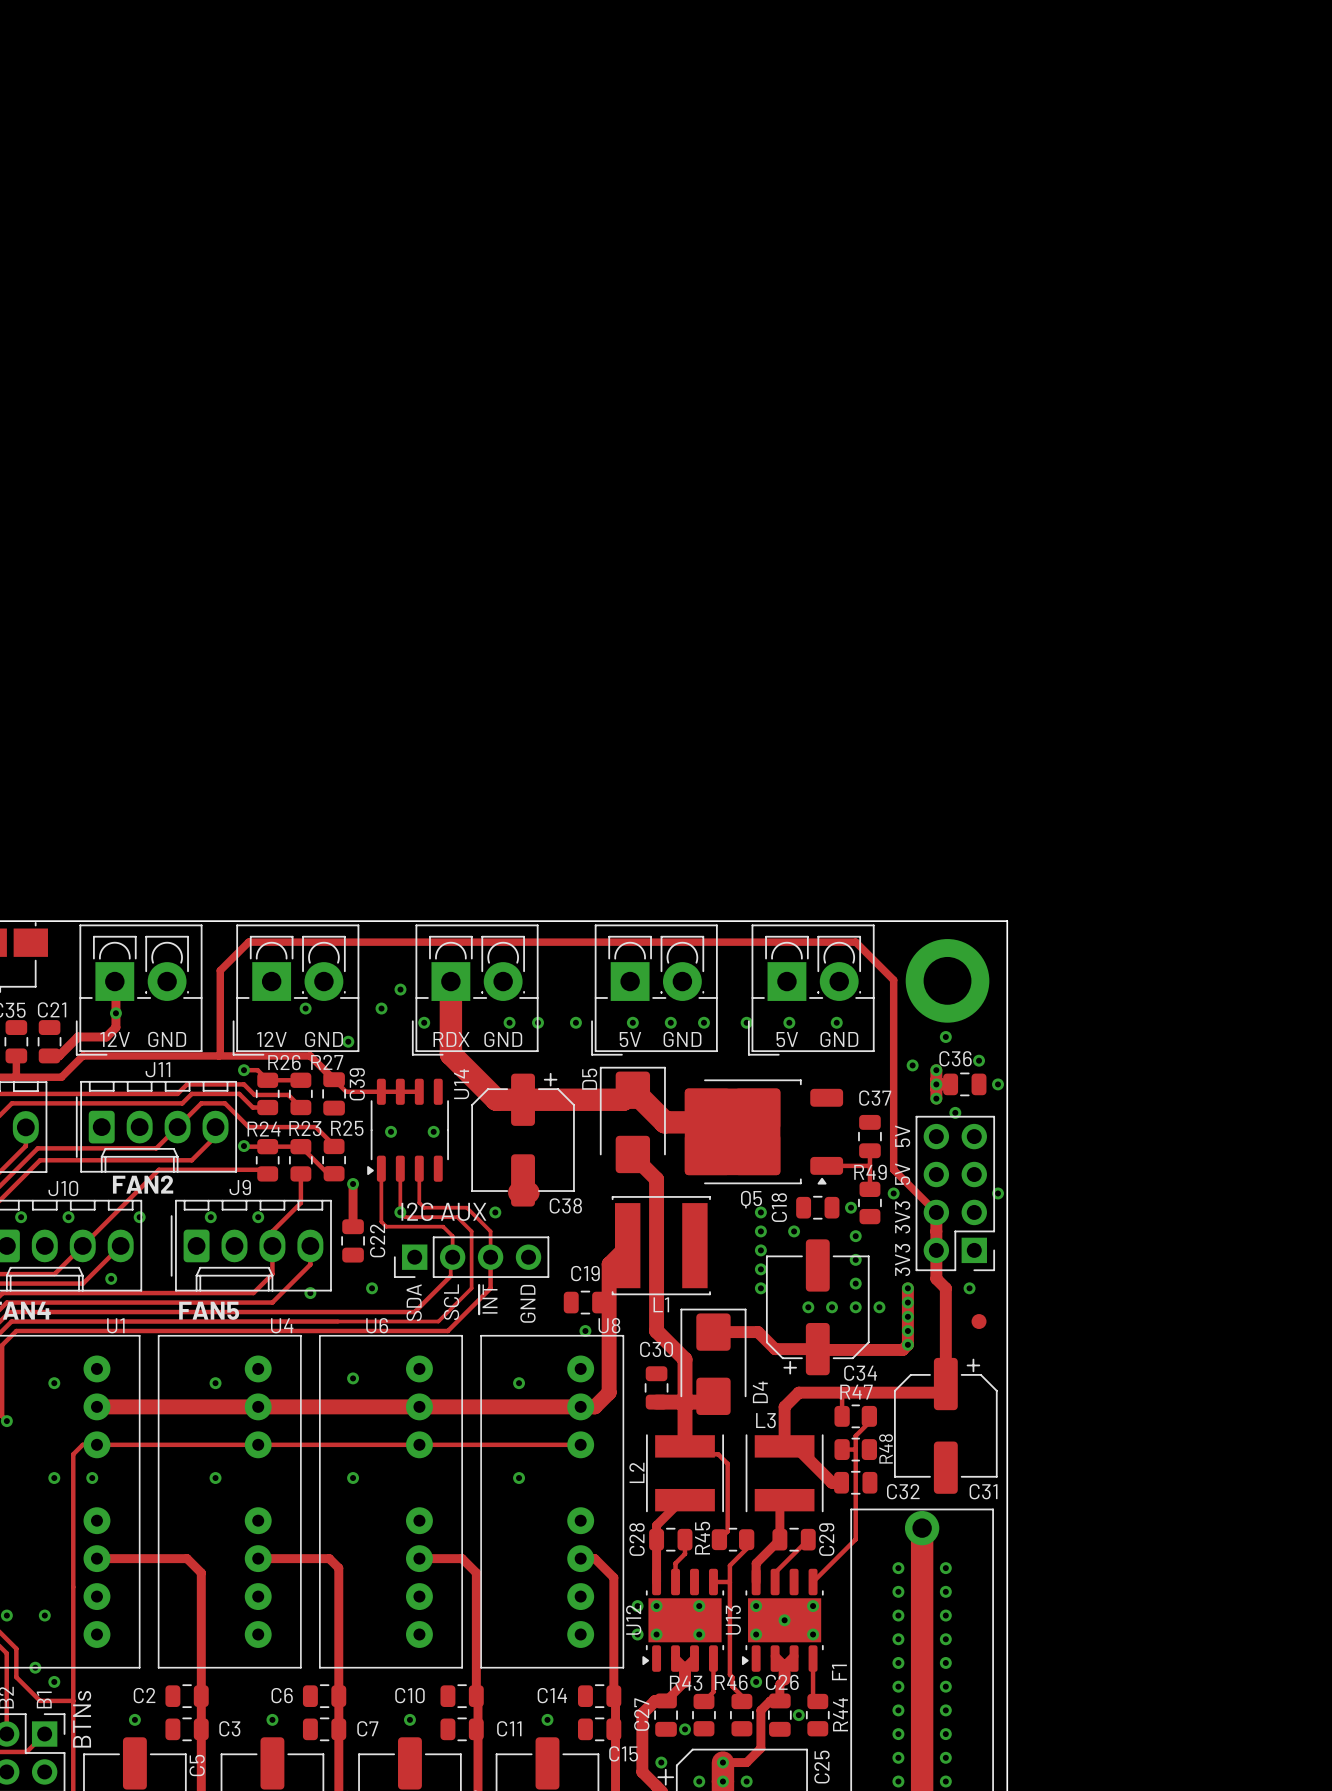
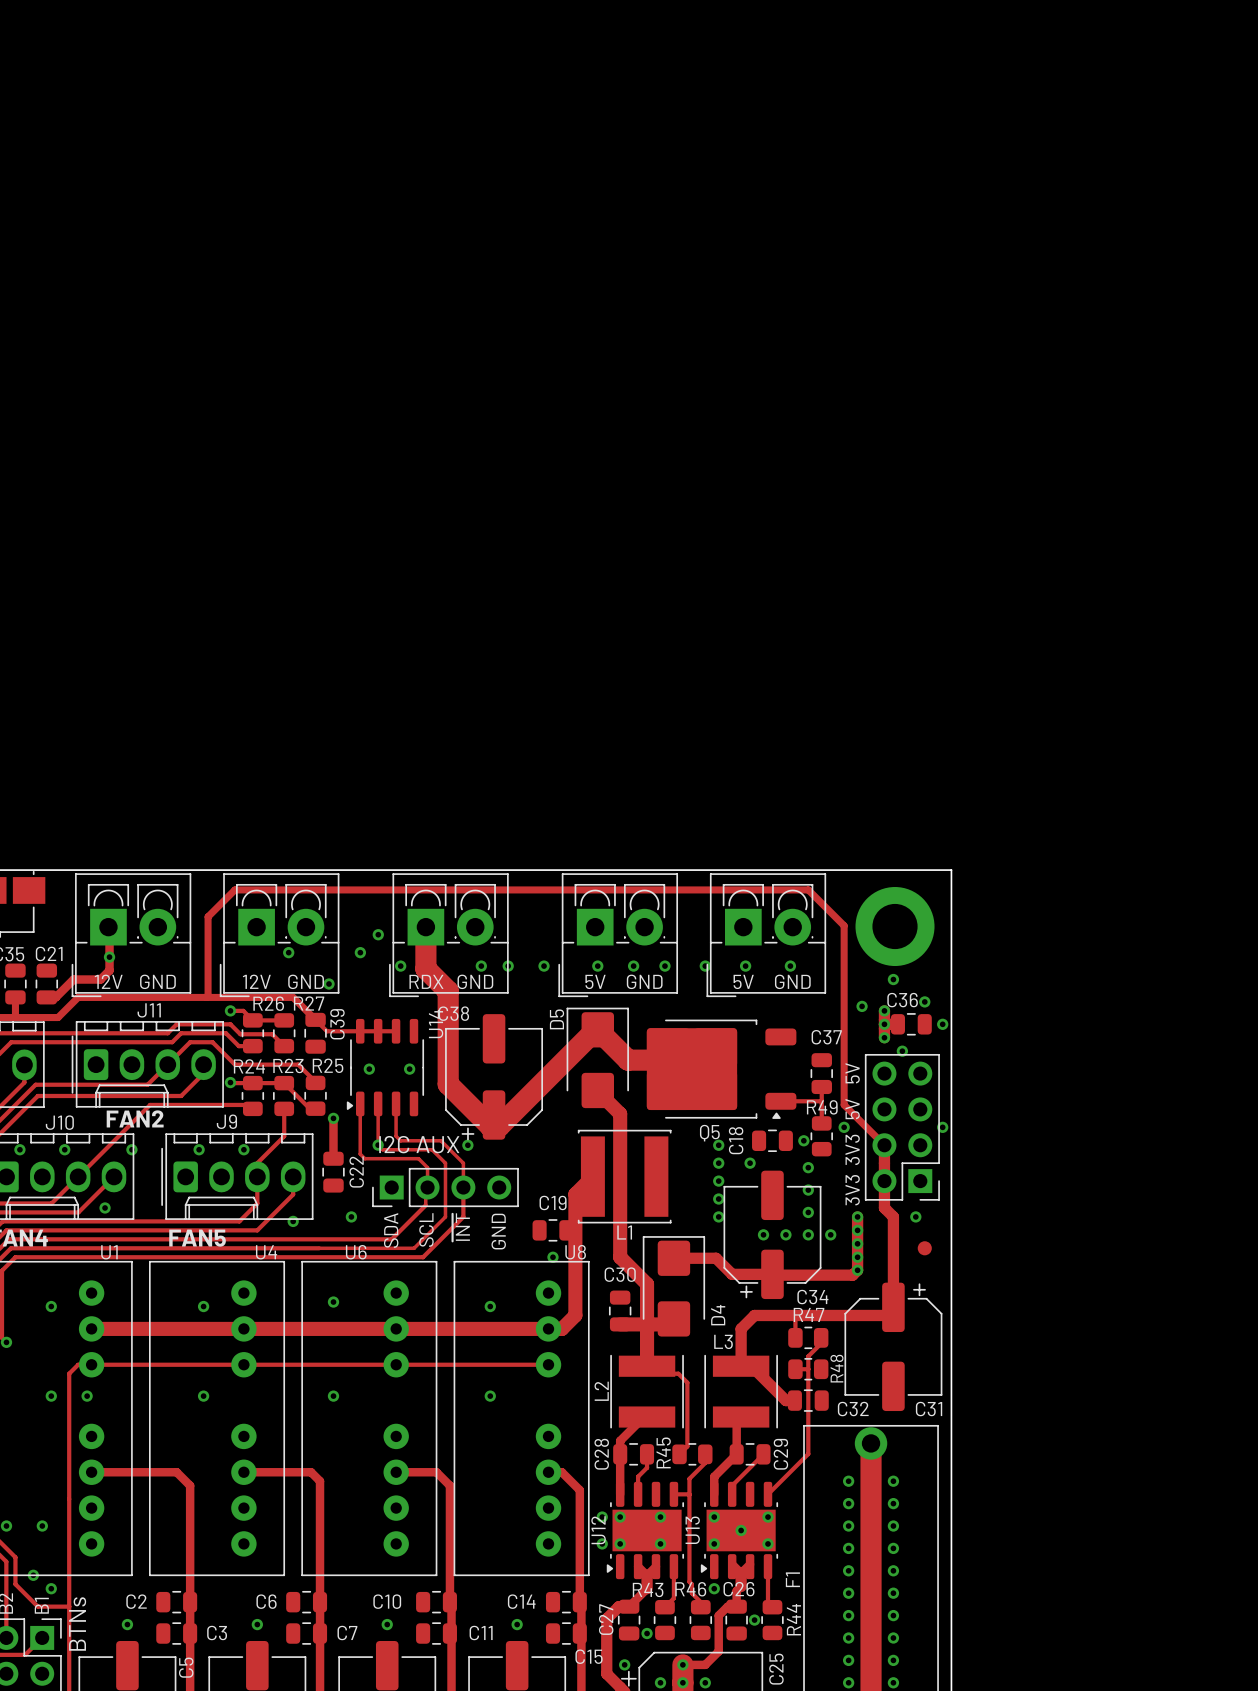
track: (450, 1025) (450, 1054) (496, 1099) (623, 1099) (632, 1090) -> (425, 968) (448, 991) (448, 1084) (490, 1126)
C38 footprint: [471, 1072, 575, 1207] -> [445, 1014, 544, 1141]
track: none -> (595, 1029) (499, 1126)
C38 name position: C38 (565, 1205) -> C38 (453, 1013)

